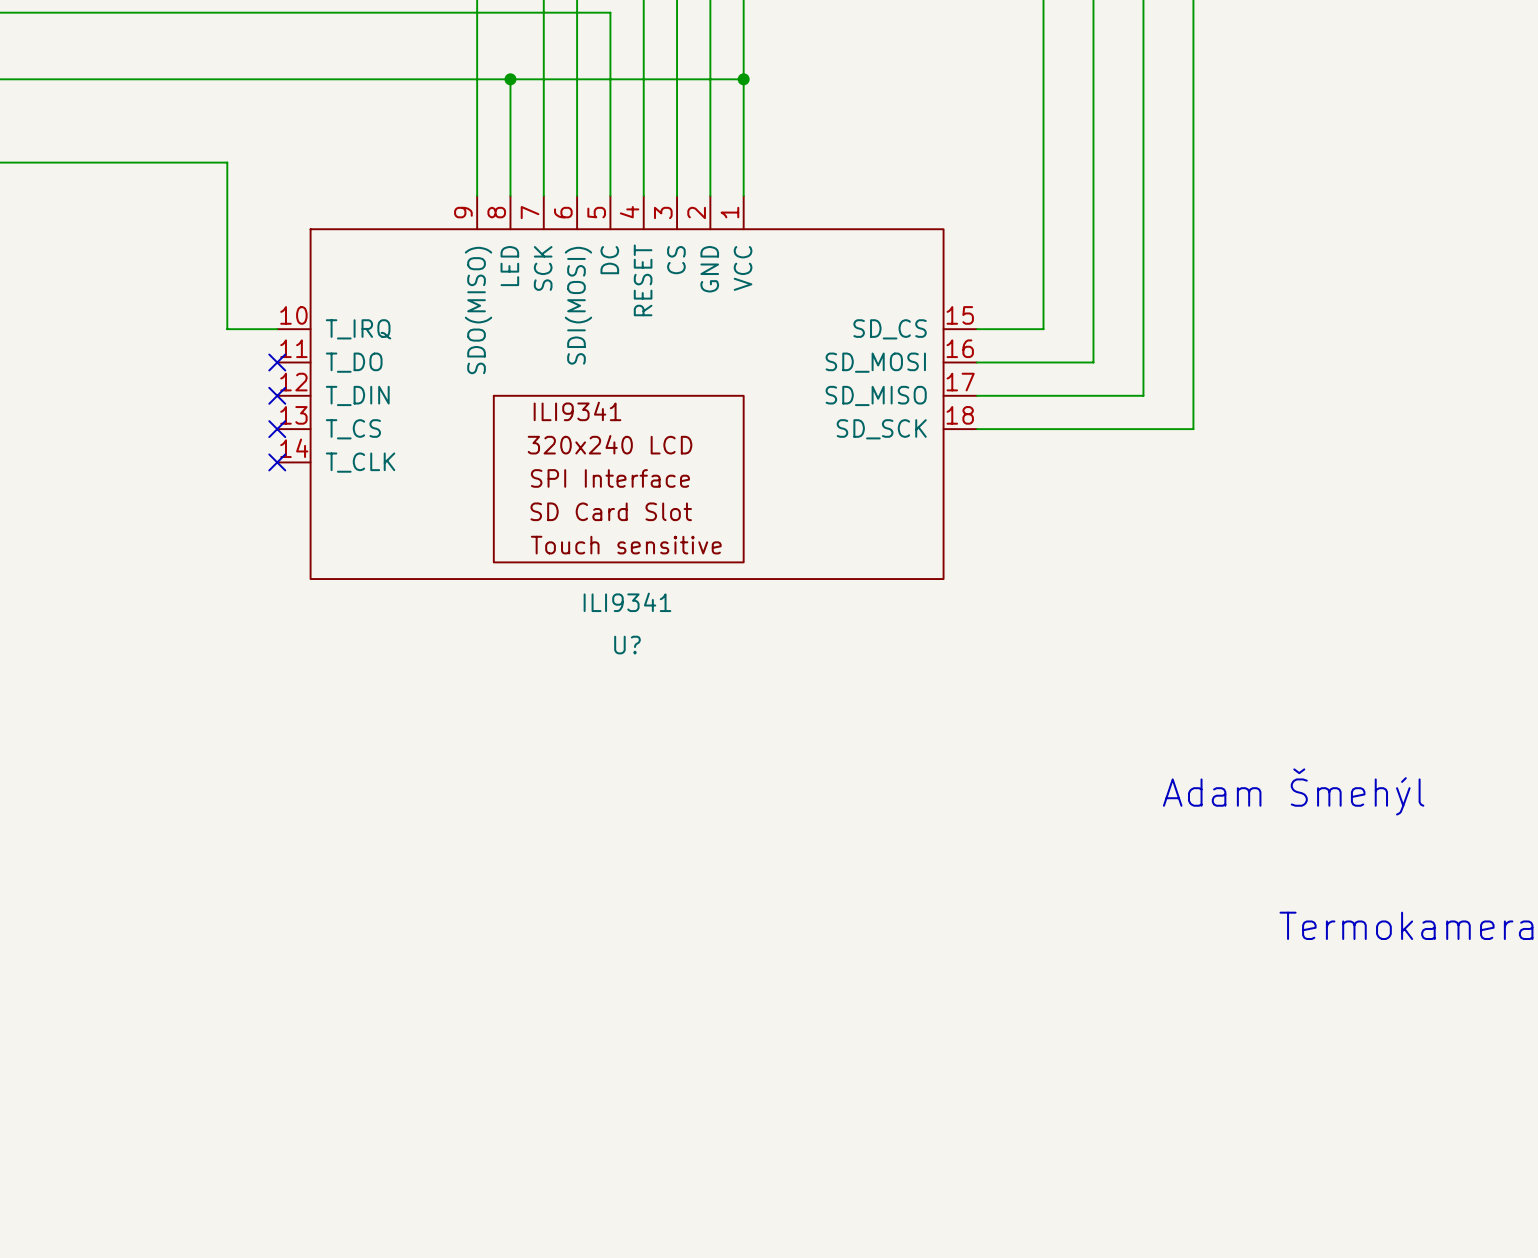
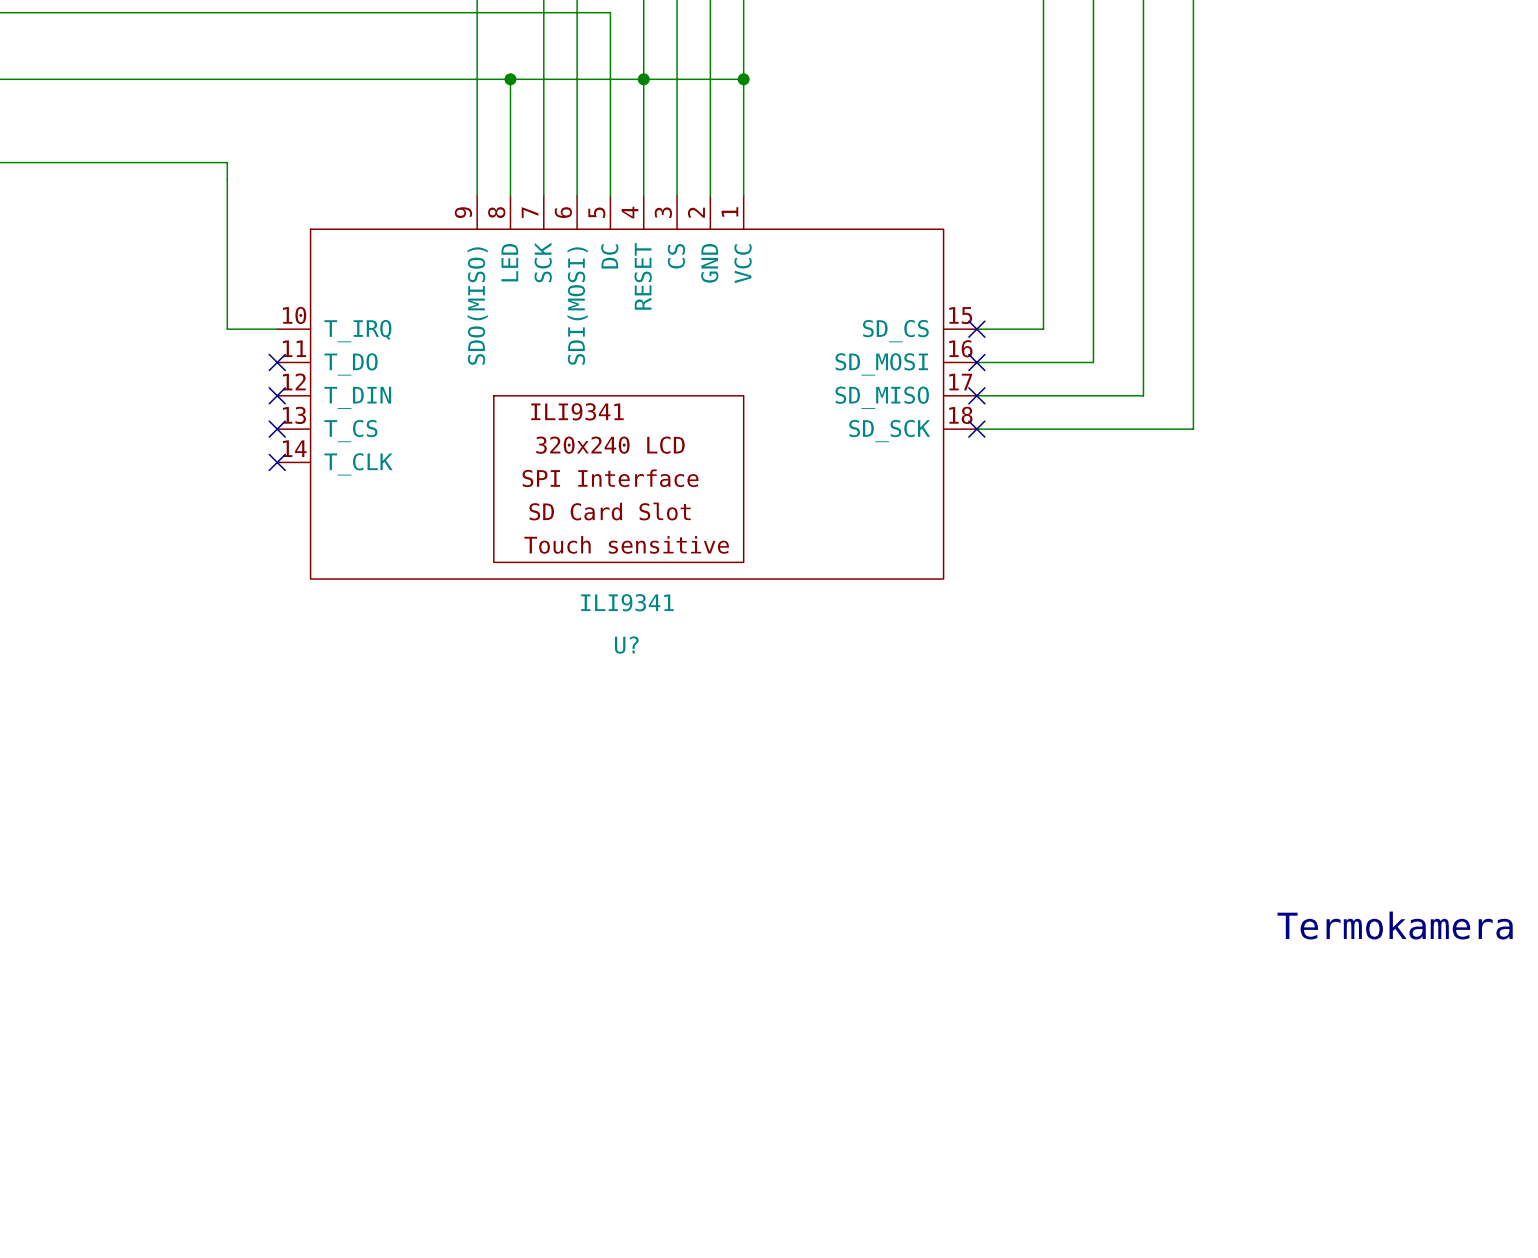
junction: none -> (643, 79)
no-connect mark: none -> (976, 329)
no-connect mark: none -> (976, 362)
no-connect mark: none -> (976, 395)
no-connect mark: none -> (976, 429)
text: Adam Šmehýl (1293, 791) -> none

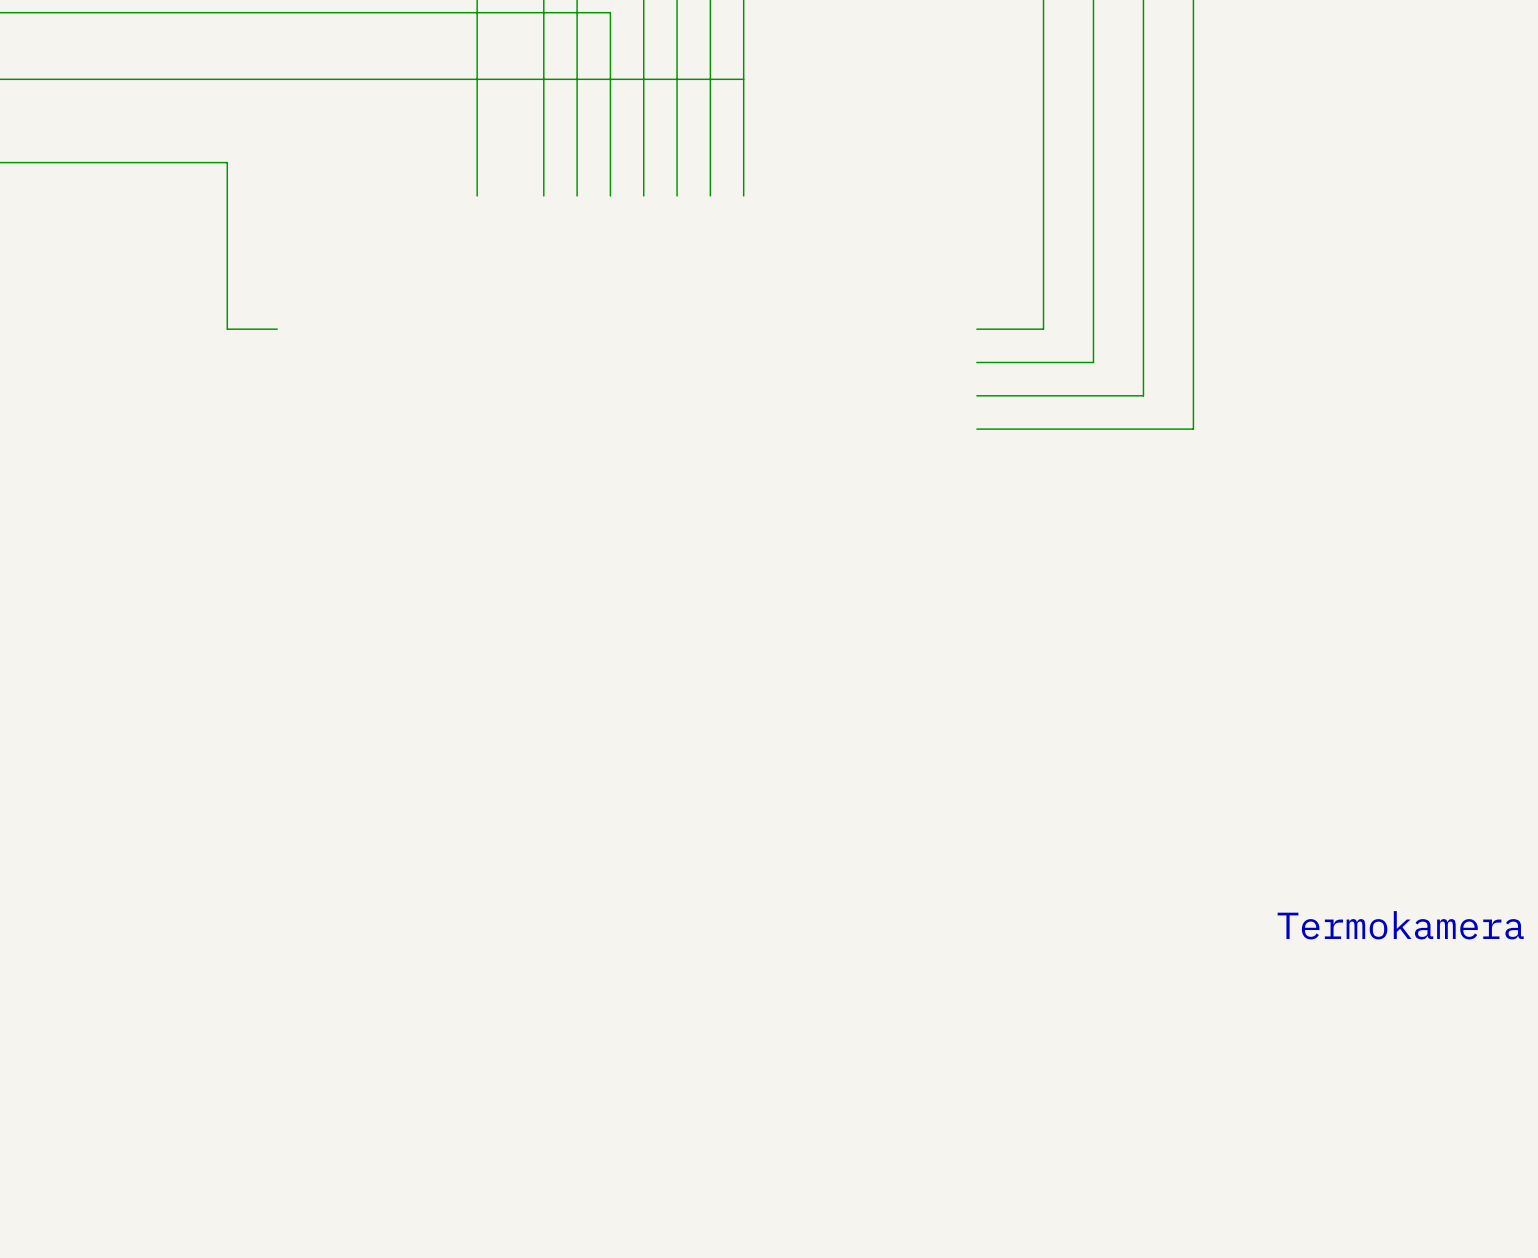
wire: (510, 79) (510, 195) -> none
junction: (510, 79) -> none
junction: (643, 79) -> none
junction: (743, 79) -> none
no-connect mark: (976, 329) -> none
no-connect mark: (277, 362) -> none
no-connect mark: (976, 362) -> none
U?: ILI9341 (627, 387) -> none
no-connect mark: (277, 395) -> none
no-connect mark: (976, 395) -> none
no-connect mark: (277, 429) -> none
no-connect mark: (976, 429) -> none
no-connect mark: (277, 462) -> none

